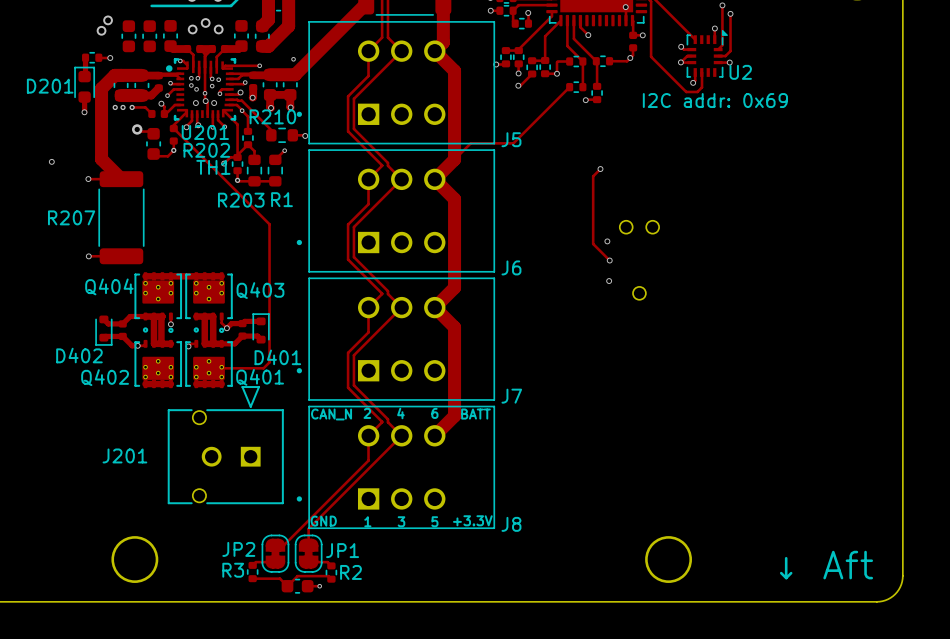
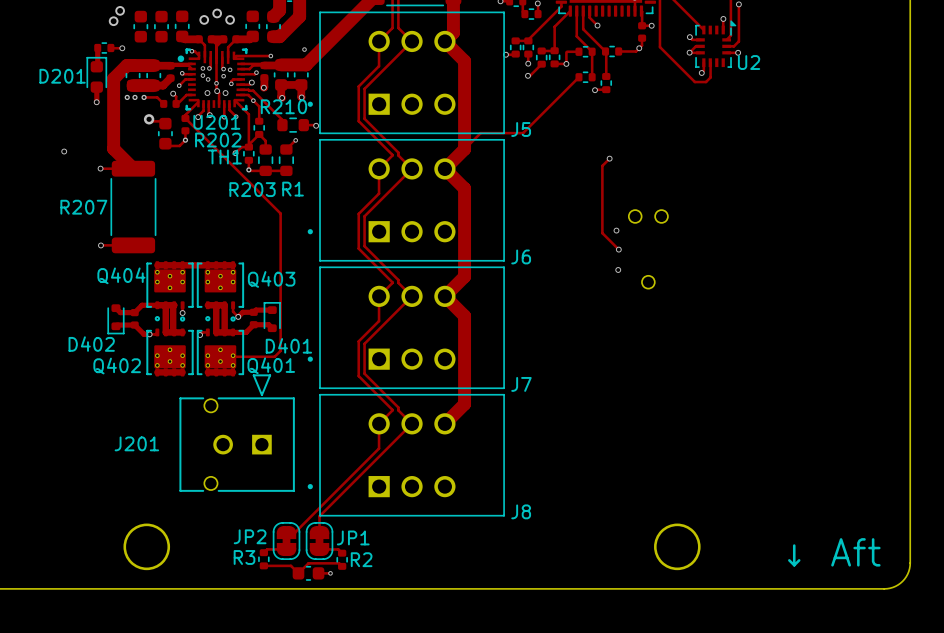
text: I2C addr: 0x69 (715, 100) -> none
text: 2 (367, 413) -> none
text: 4 (400, 413) -> none
text: 6 (434, 413) -> none
text: CAN_N (331, 414) -> none
text: BATT (476, 414) -> none
text: +3.3V (472, 520) -> none
text: GND (323, 521) -> none
text: 1 (367, 521) -> none
text: 3 (401, 521) -> none
text: 5 (434, 521) -> none

